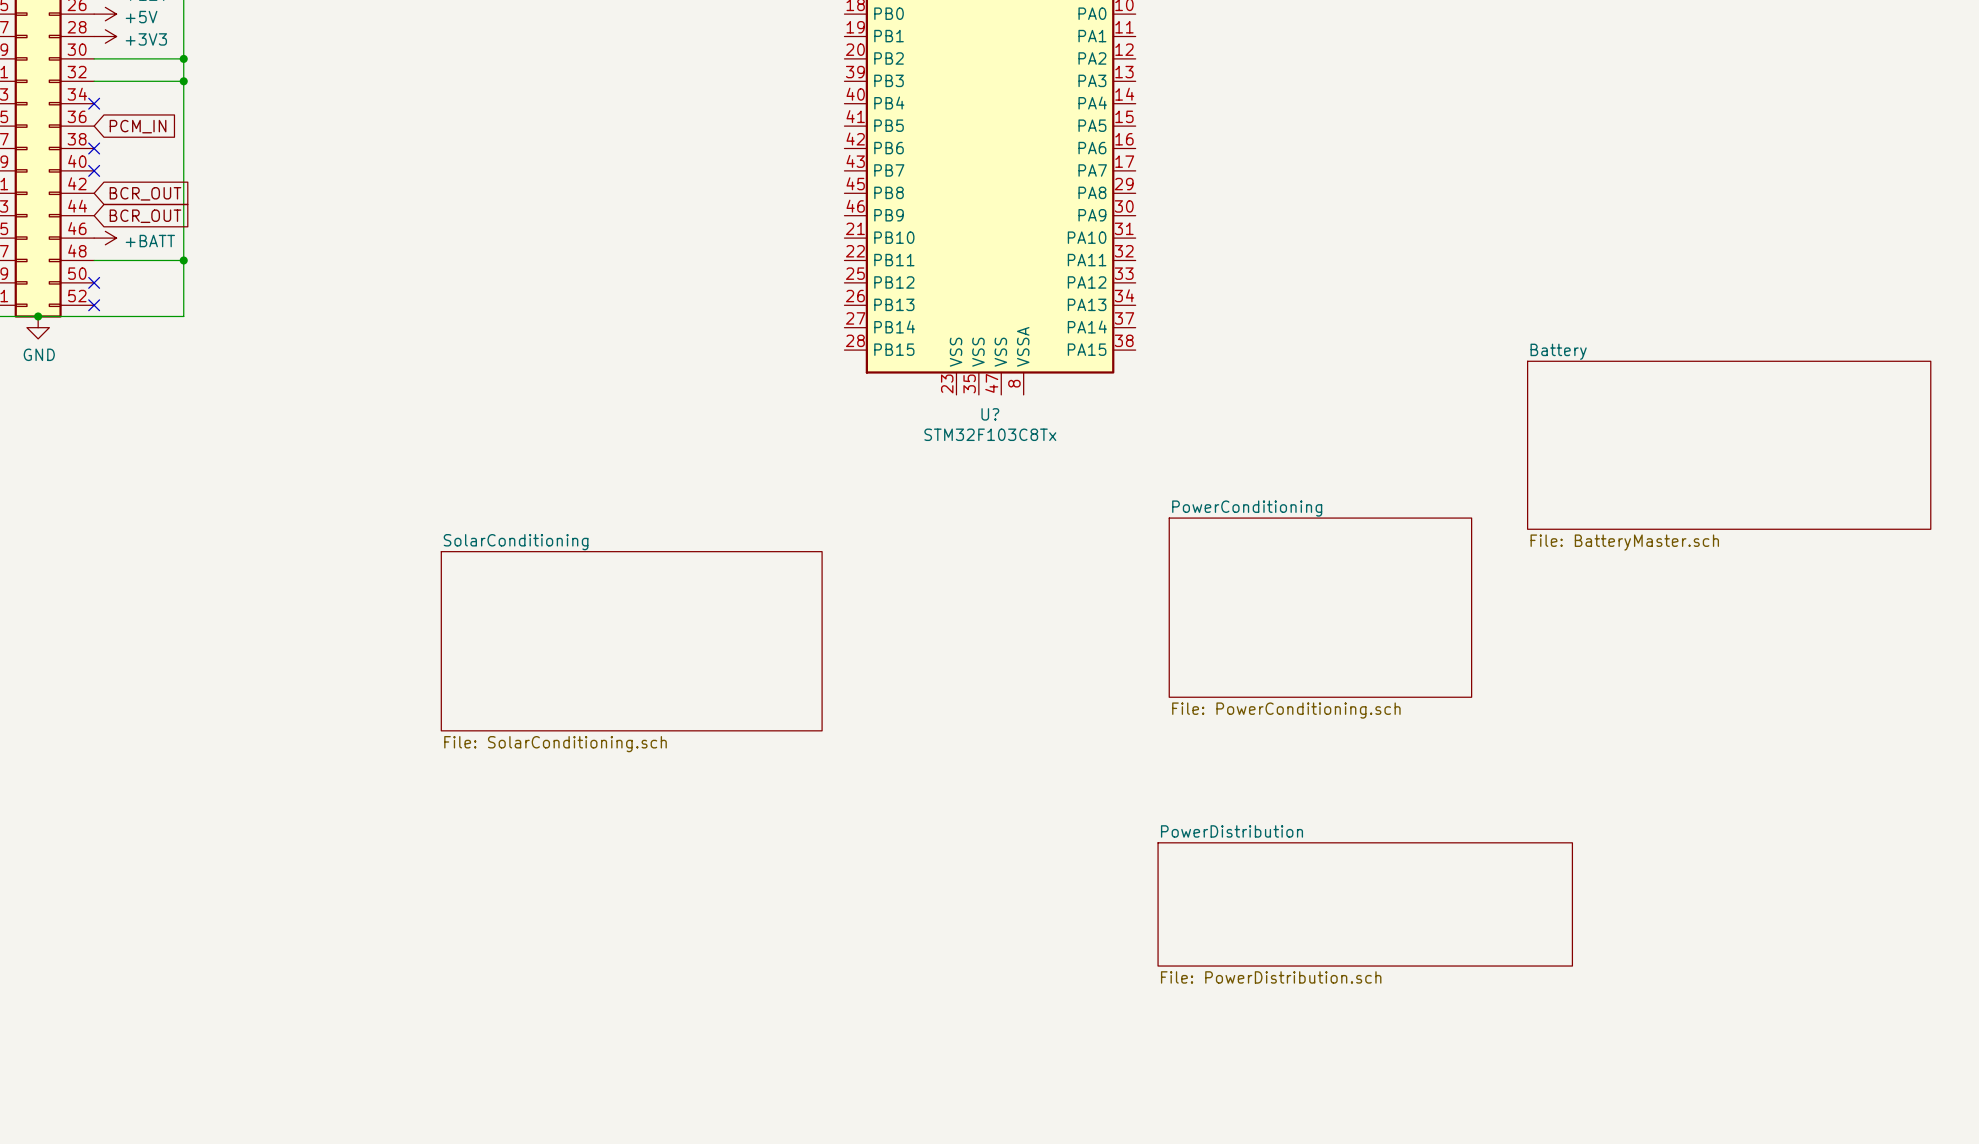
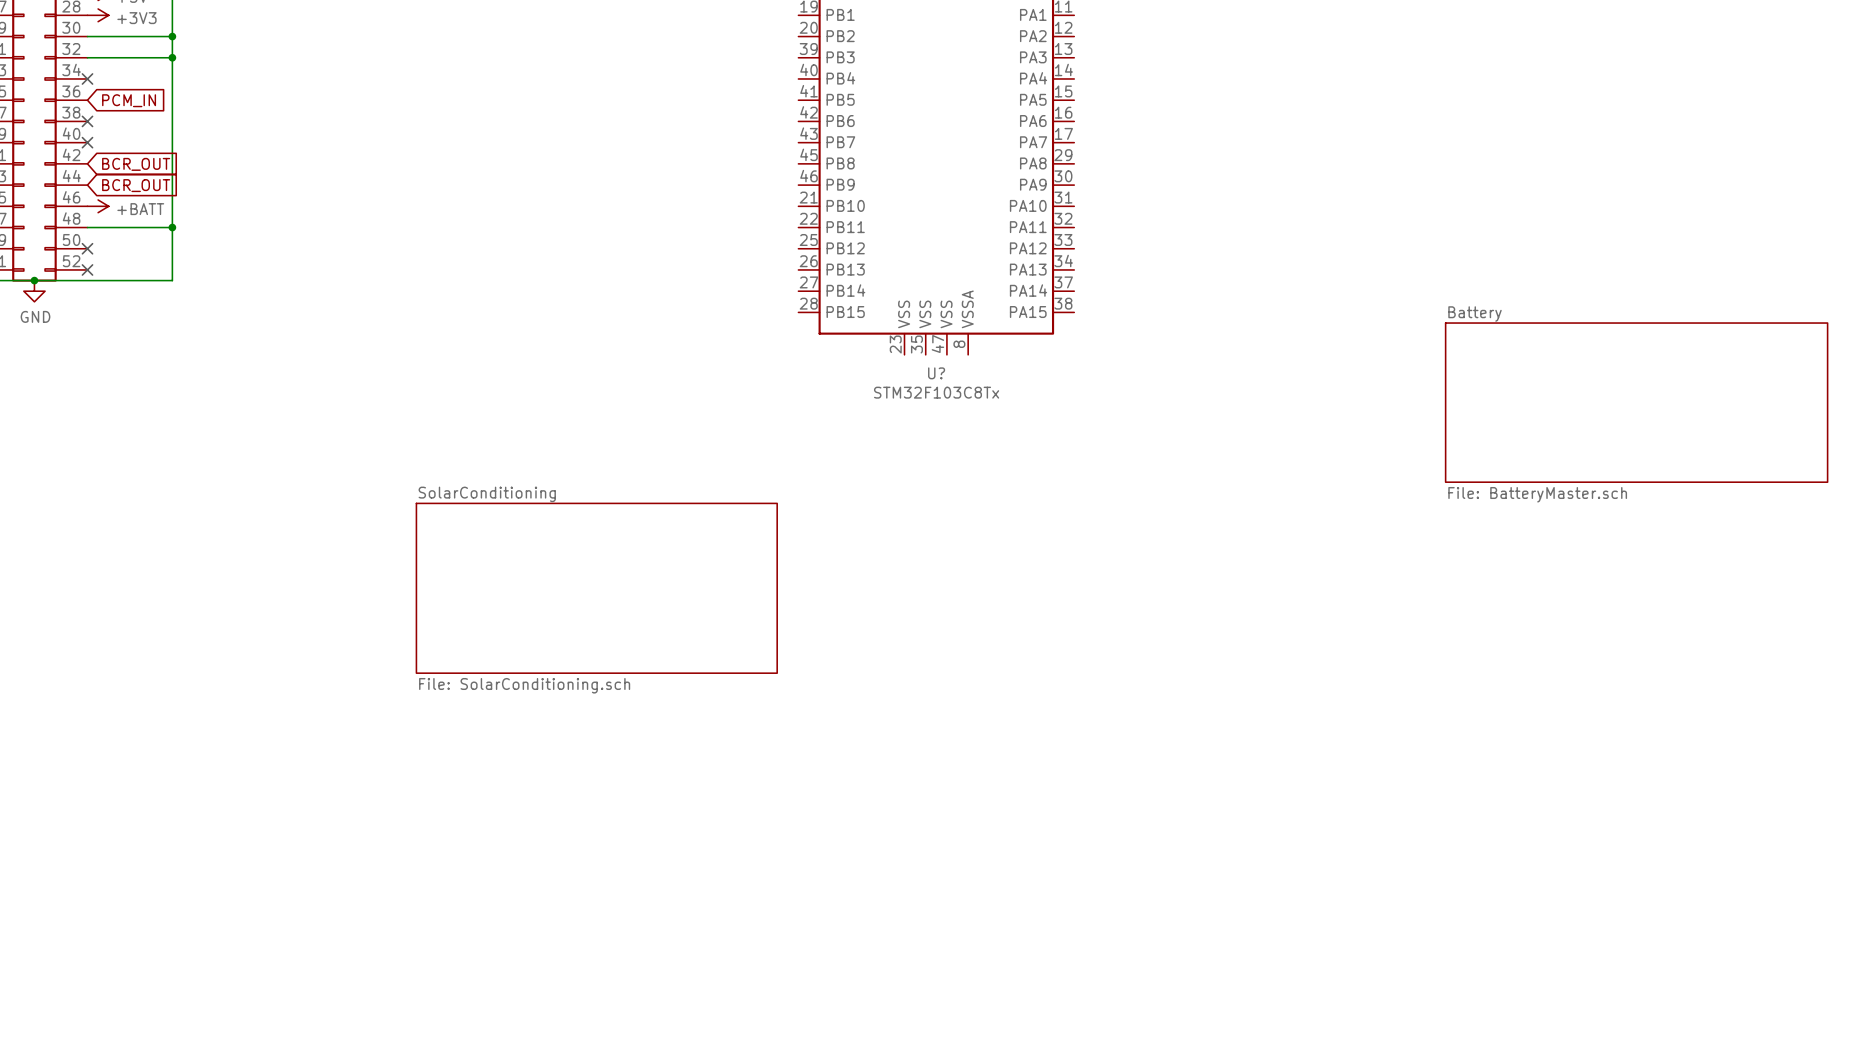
sheet PowerConditioning: File: PowerConditioning.sch (1320, 607) -> none
sheet PowerDistribution: File: PowerDistribution.sch (1365, 904) -> none

